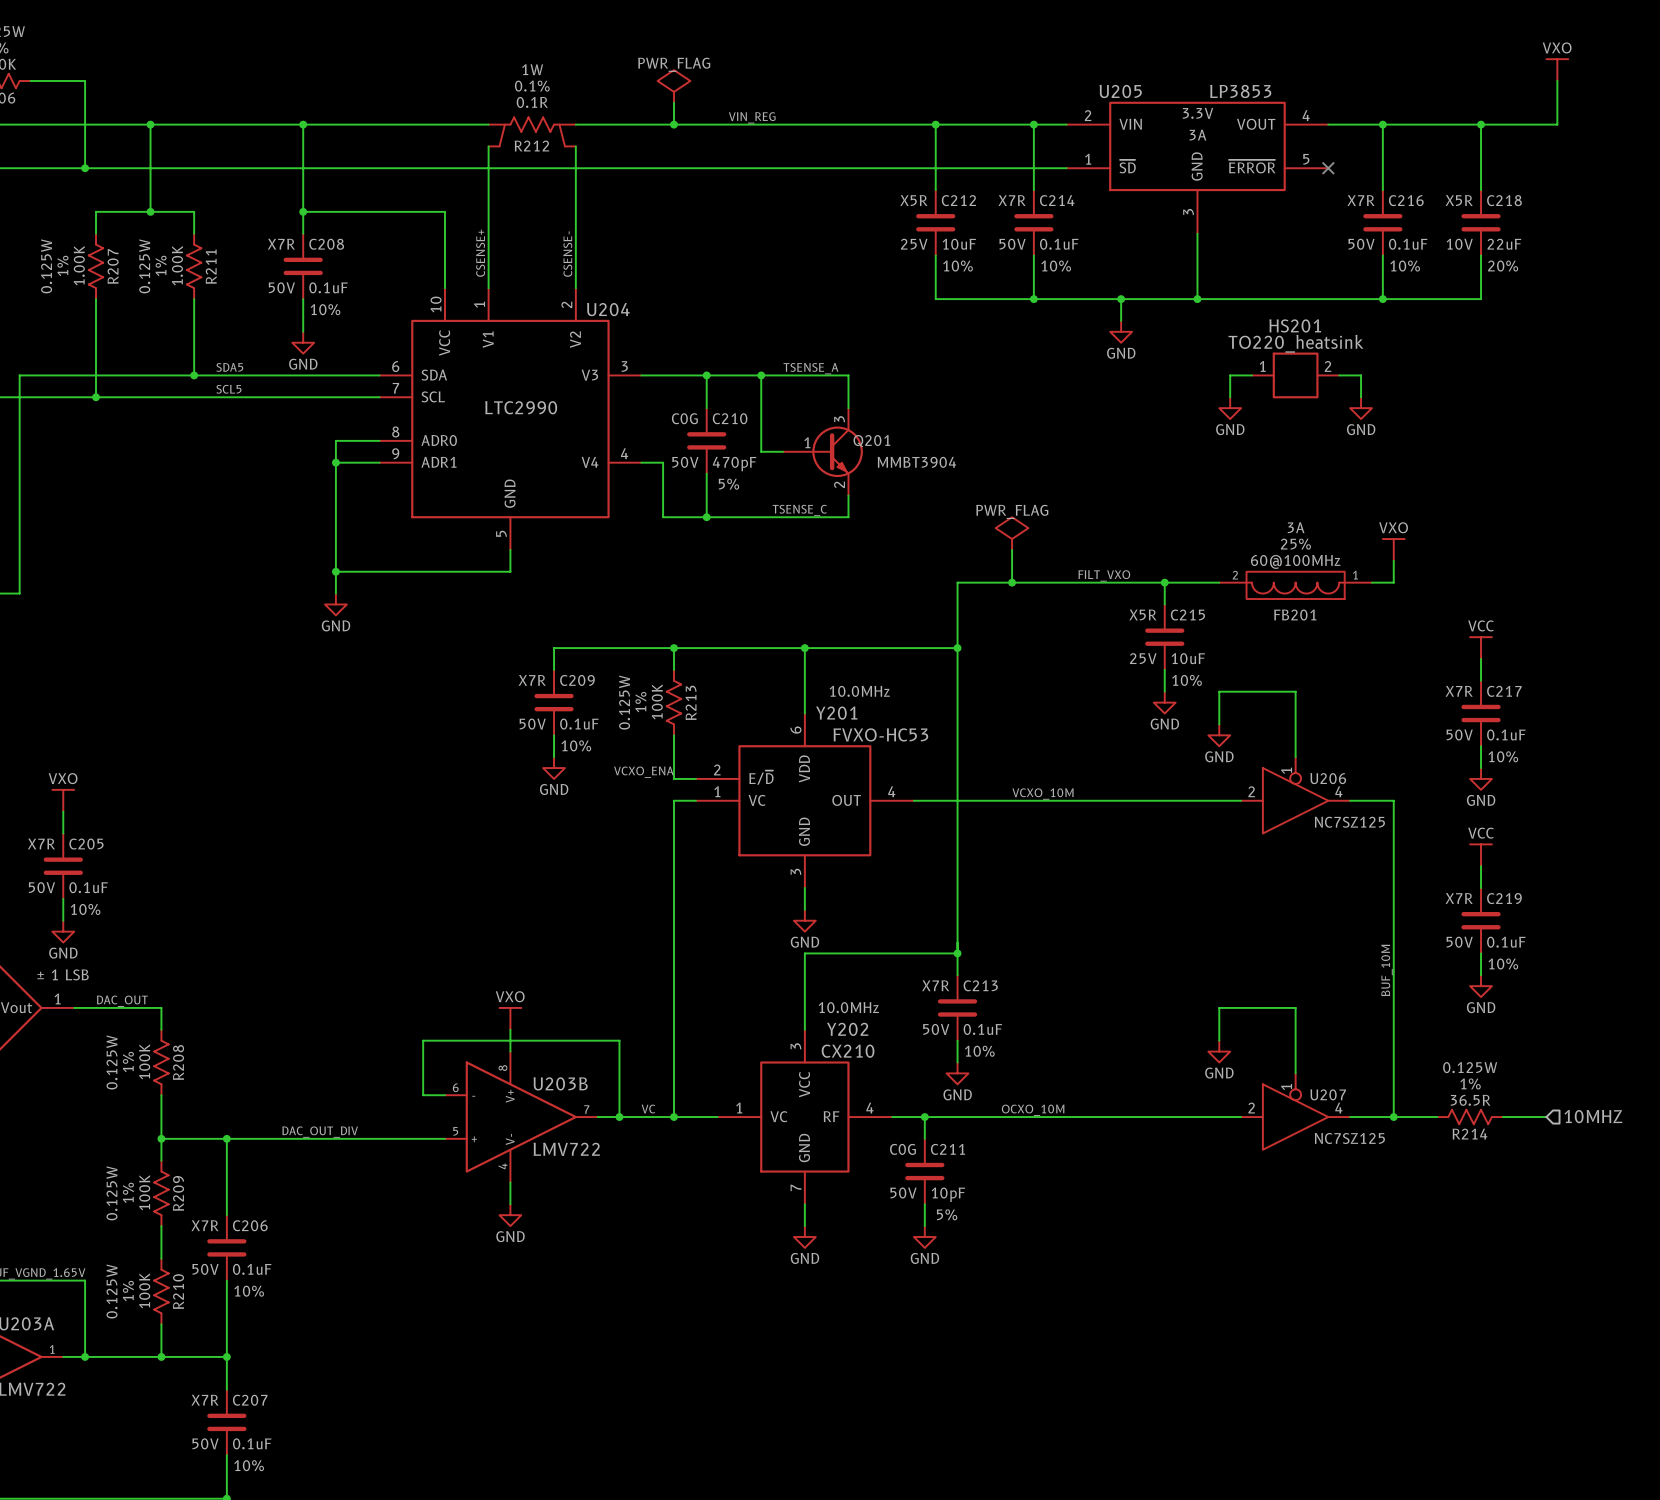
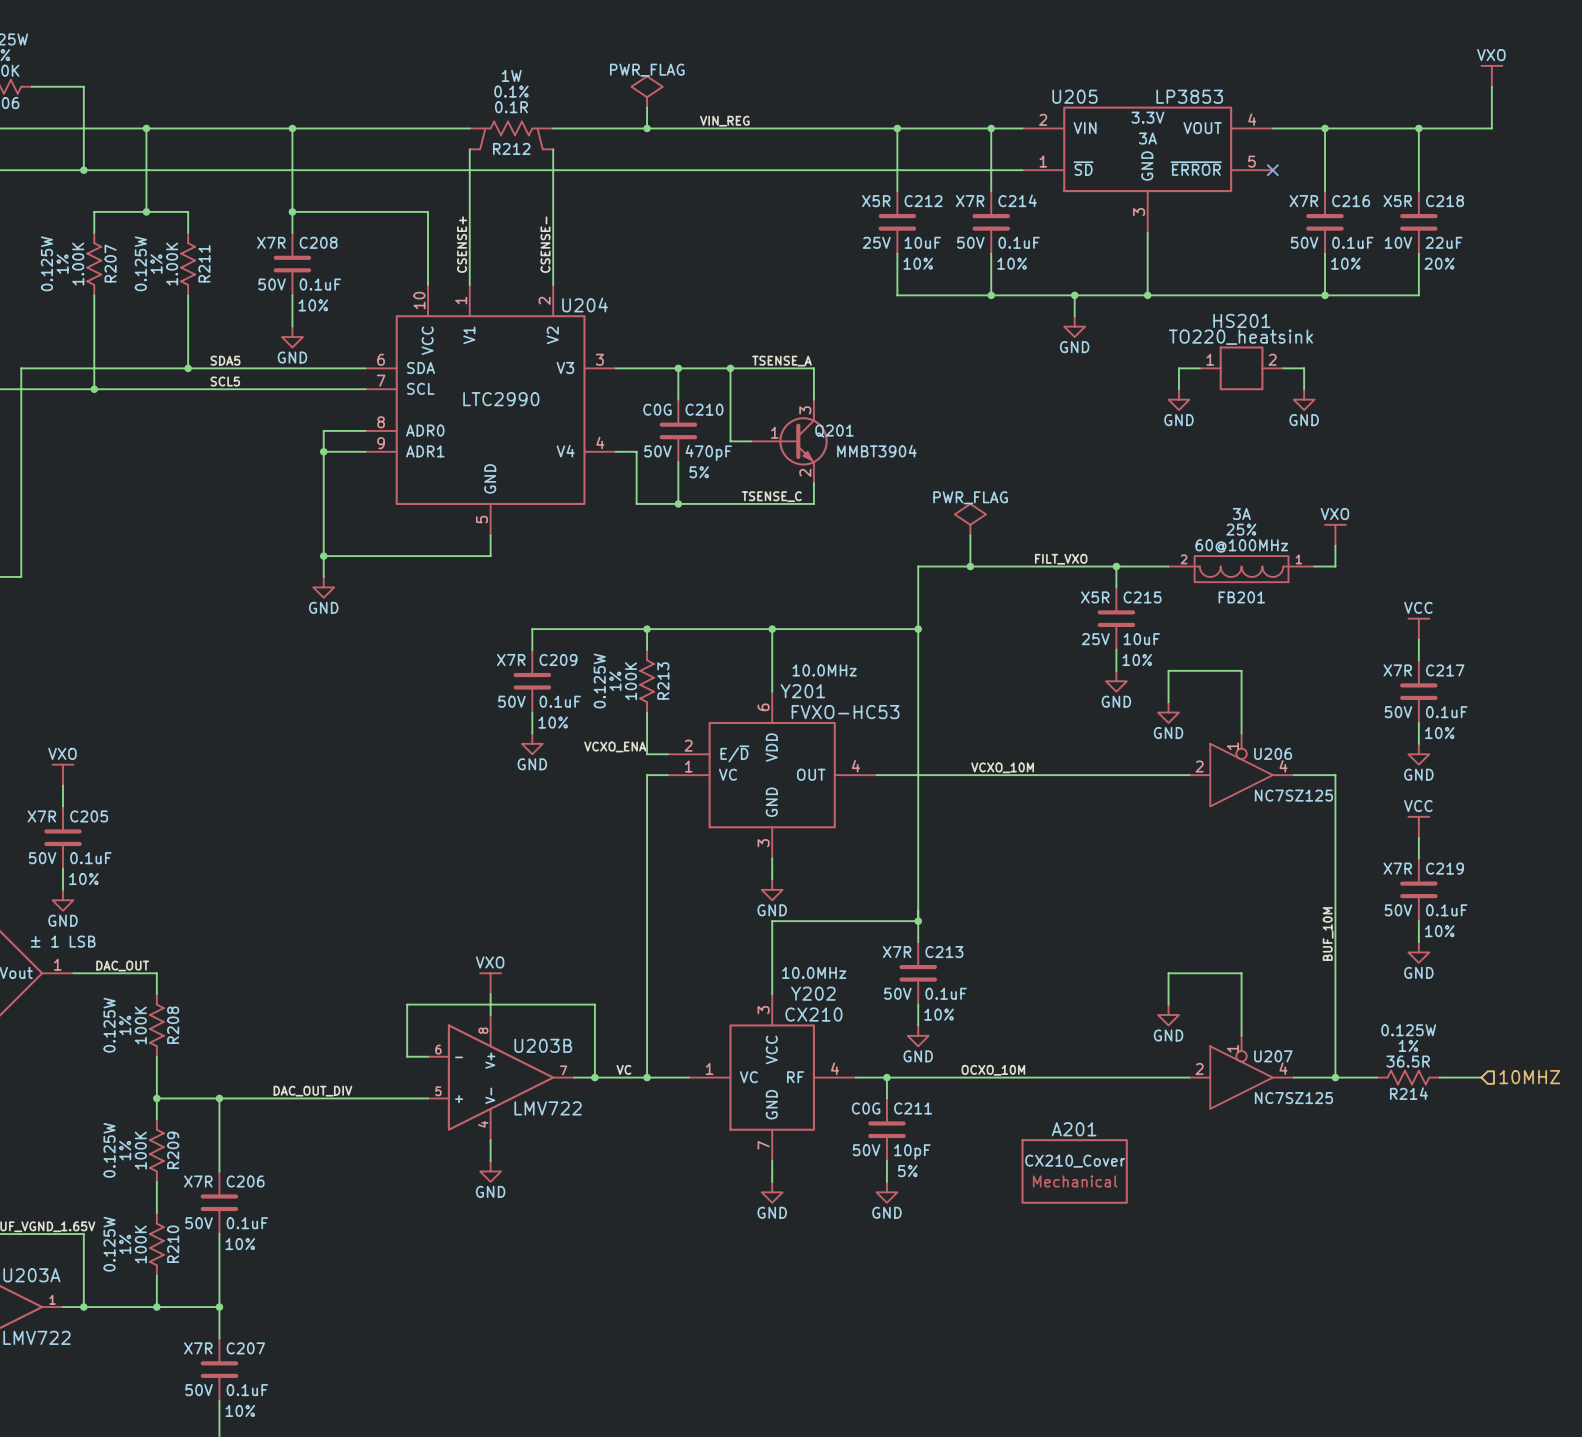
A201: none -> CX210_Cover (1074, 1171)

